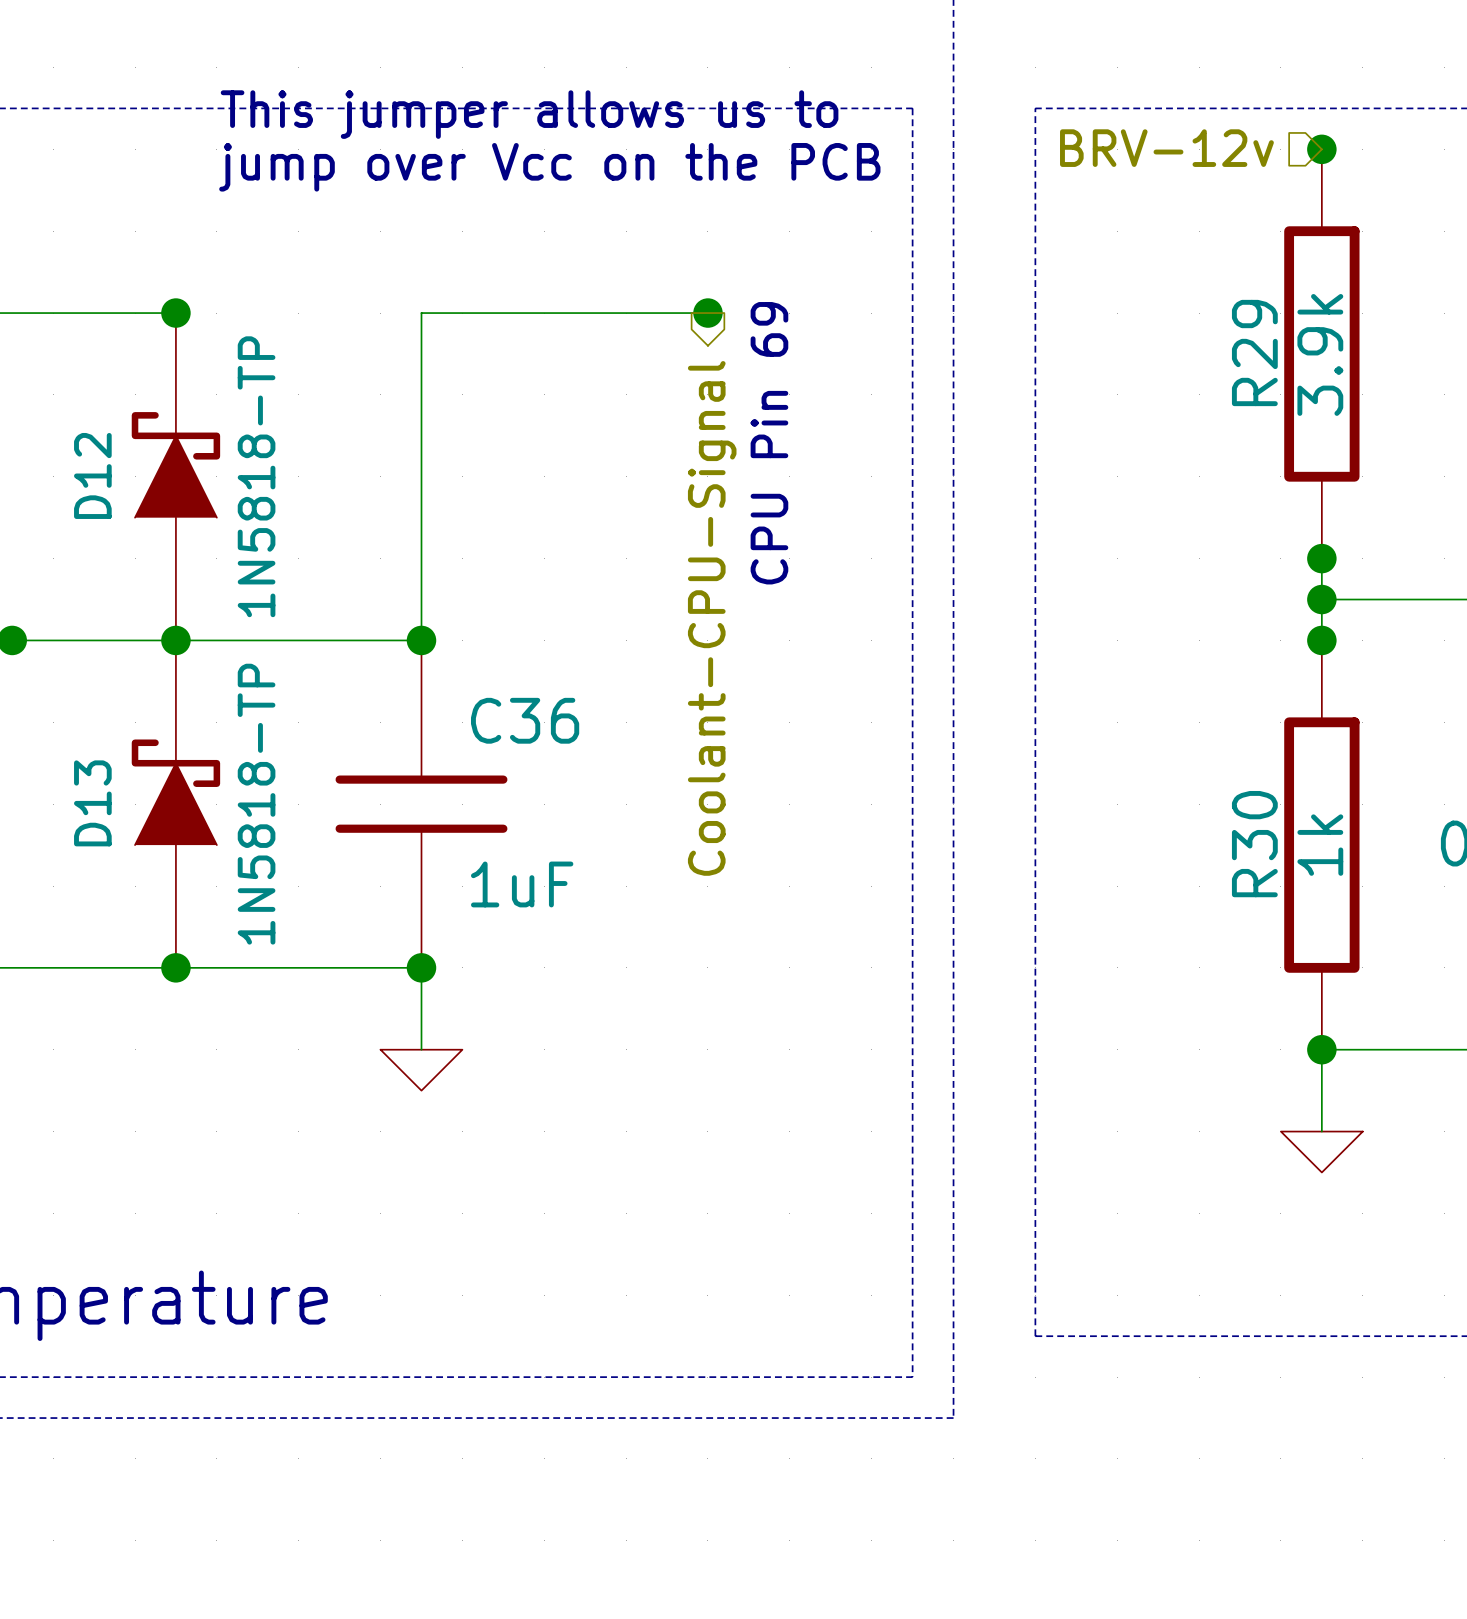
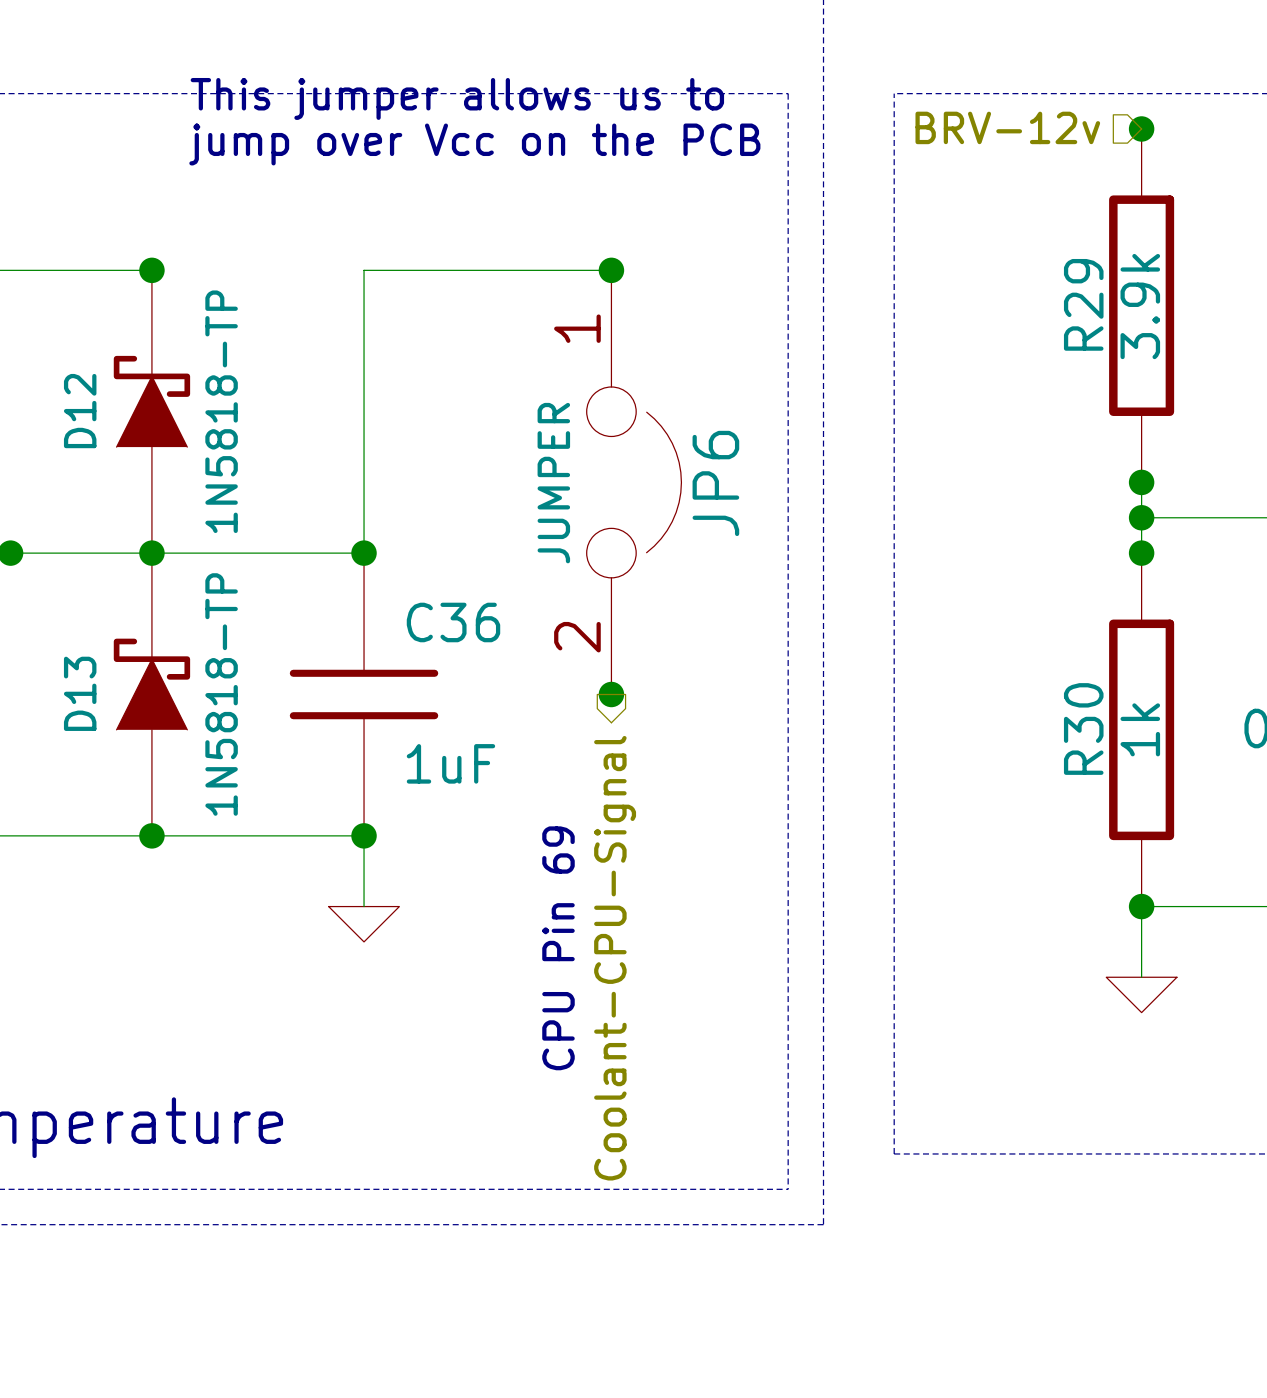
text position: CPU Pin 69 (769, 443) -> CPU Pin 69 (558, 948)
JP6: none -> JUMPER (634, 482)
hierarchical label position: Coolant-CPU-Signal (712, 618) -> Coolant-CPU-Signal (615, 958)
junction: none -> (611, 694)

